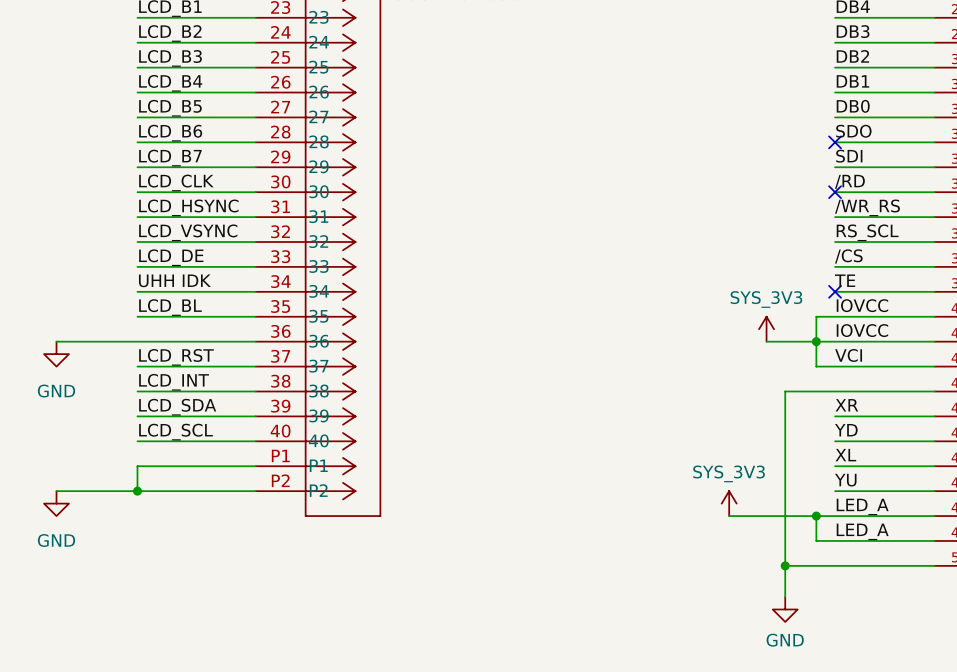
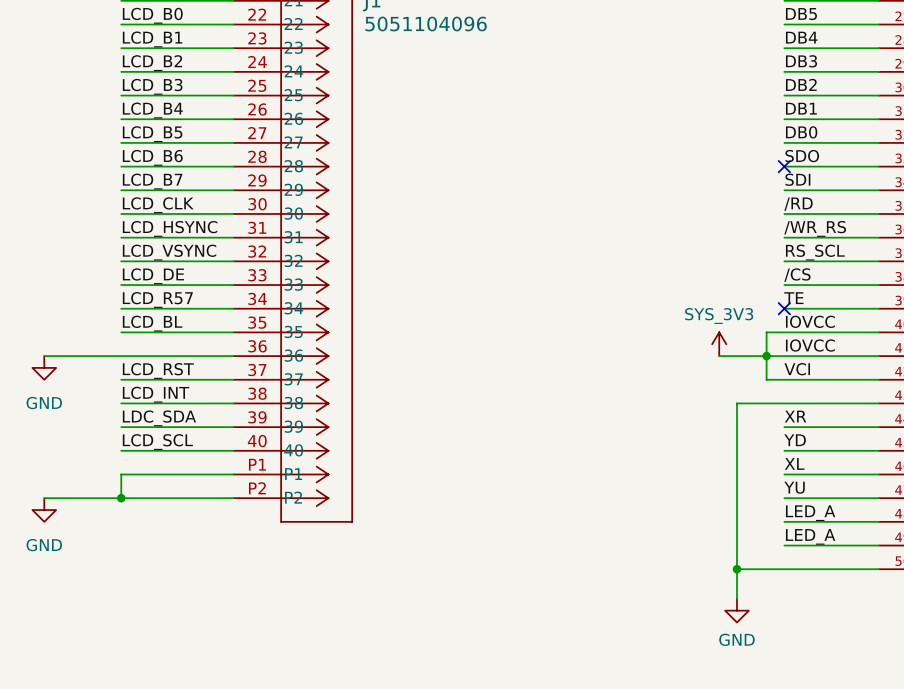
no-connect mark: (835, 192) -> none
label: UHH IDK (174, 280) -> LCD_R57 (157, 299)
label: LCD_SDA (177, 407) -> LDC_SDA (159, 418)
power symbol: SYS_3V3 (729, 503) -> none
wire: (729, 516) (835, 516) -> none
wire: (816, 516) (816, 540) (835, 540) -> none
junction: (816, 516) -> none

